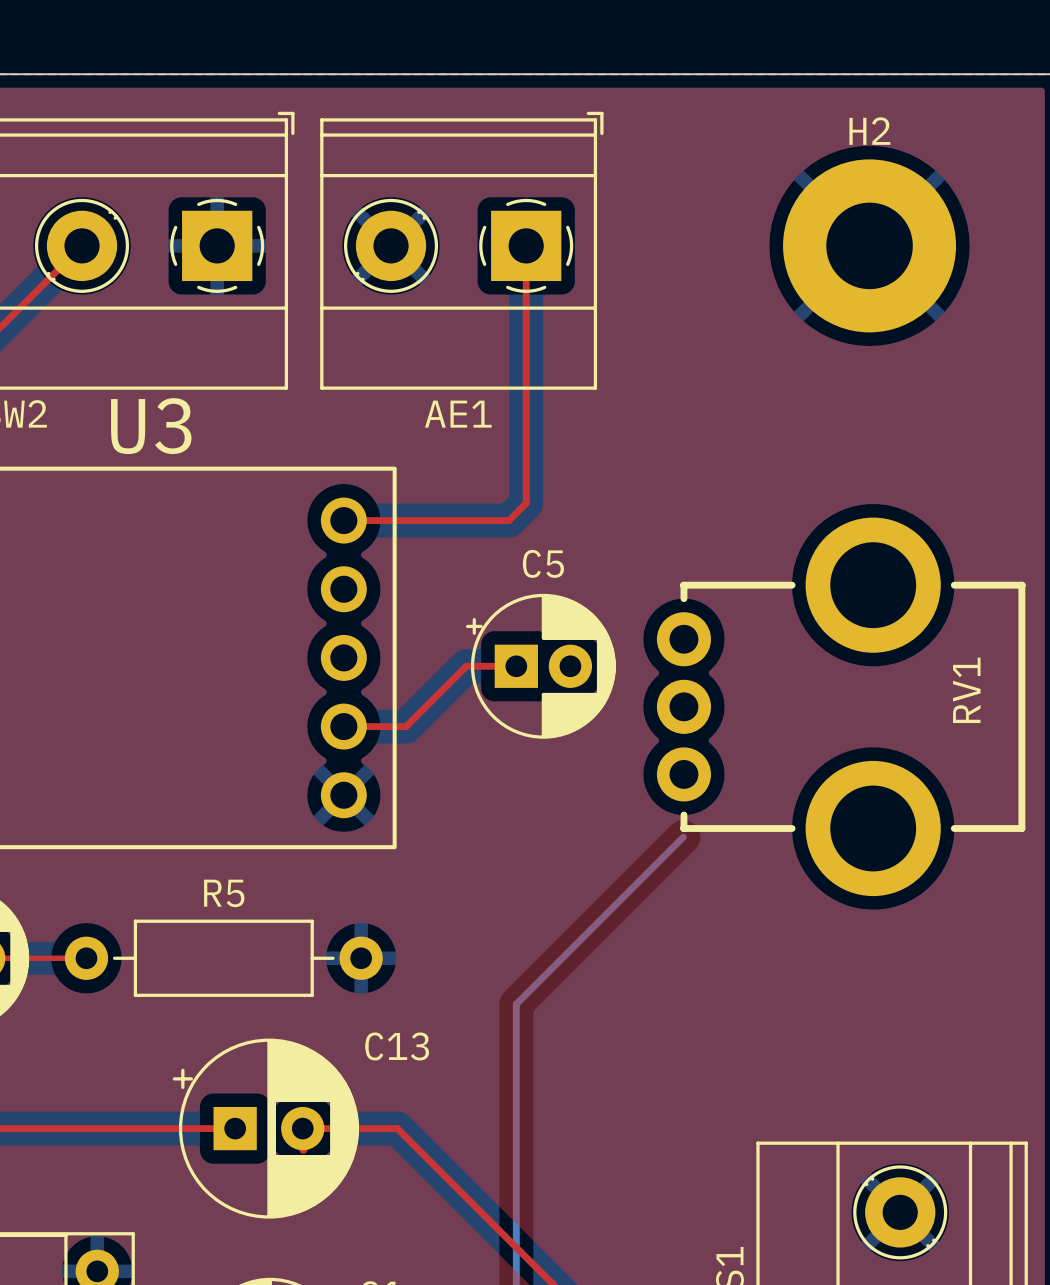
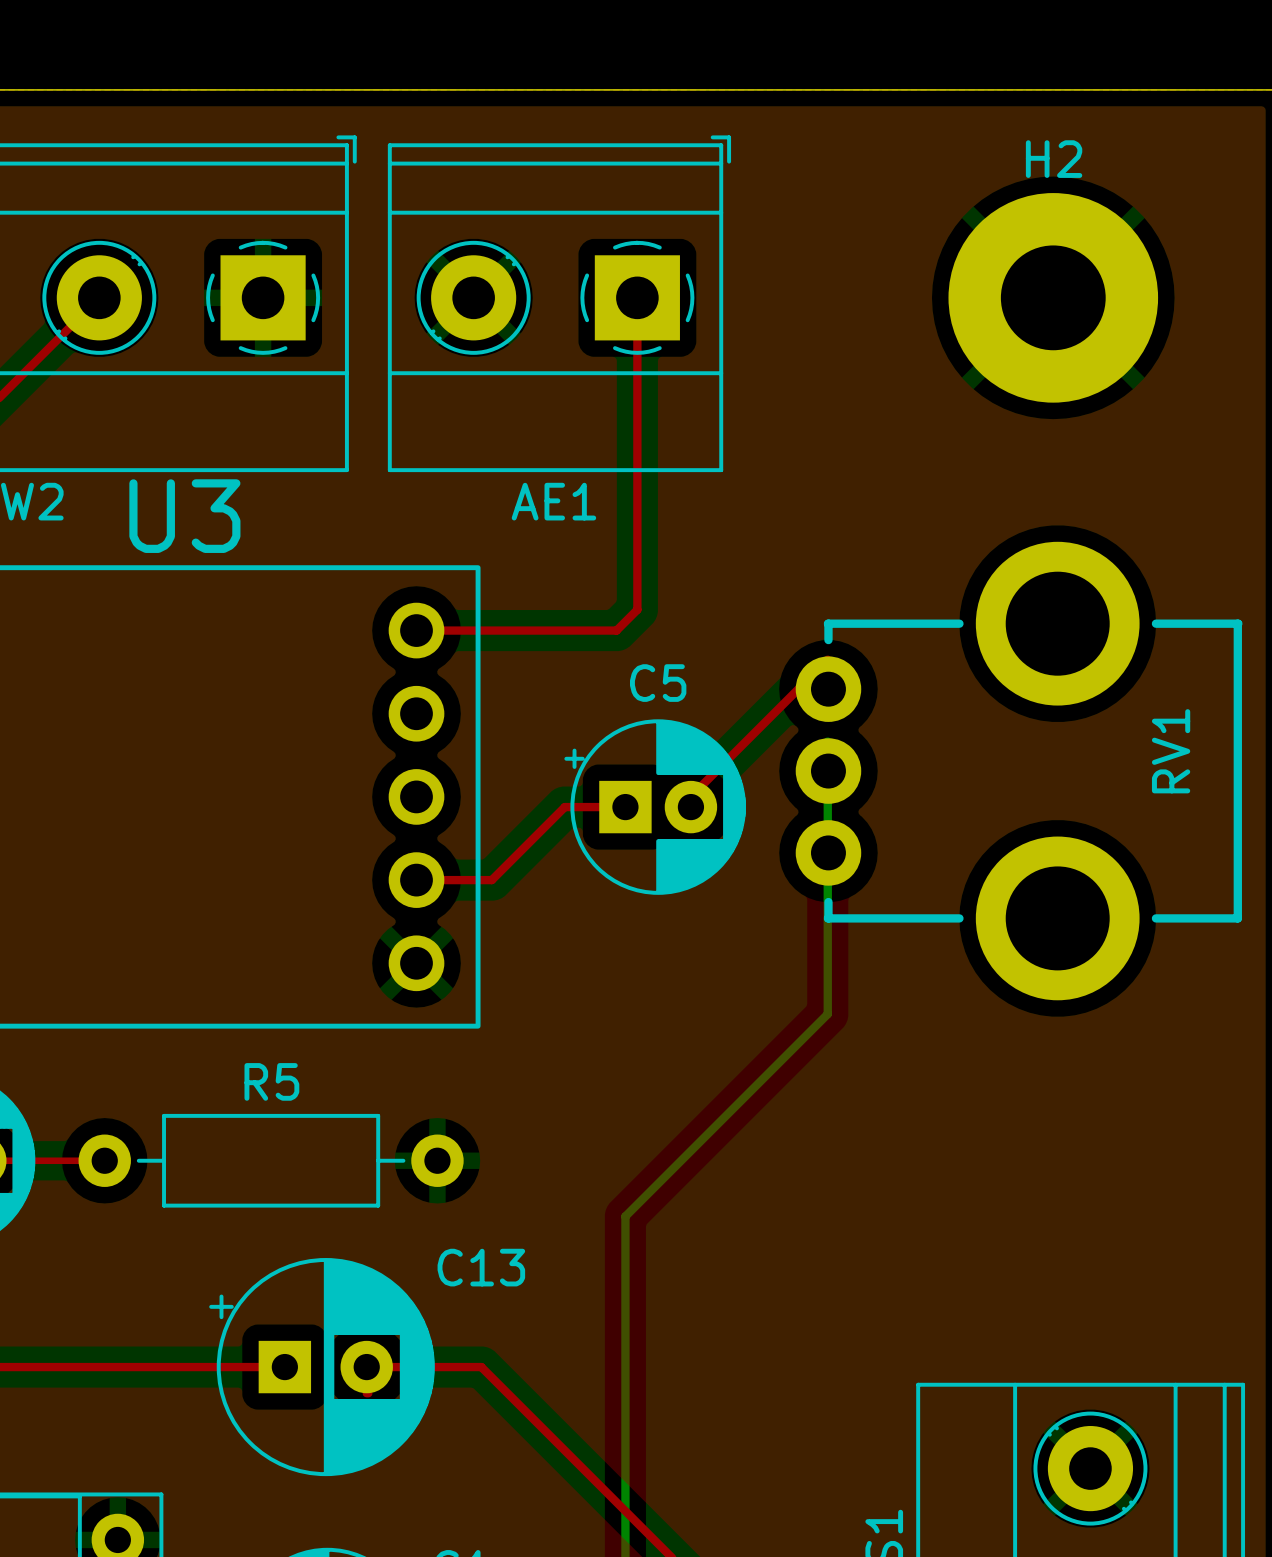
top track: none -> (827, 659) (690, 796)
bottom track: none -> (827, 741) (827, 1014)
RV1 position: (841, 706) -> (1019, 771)

